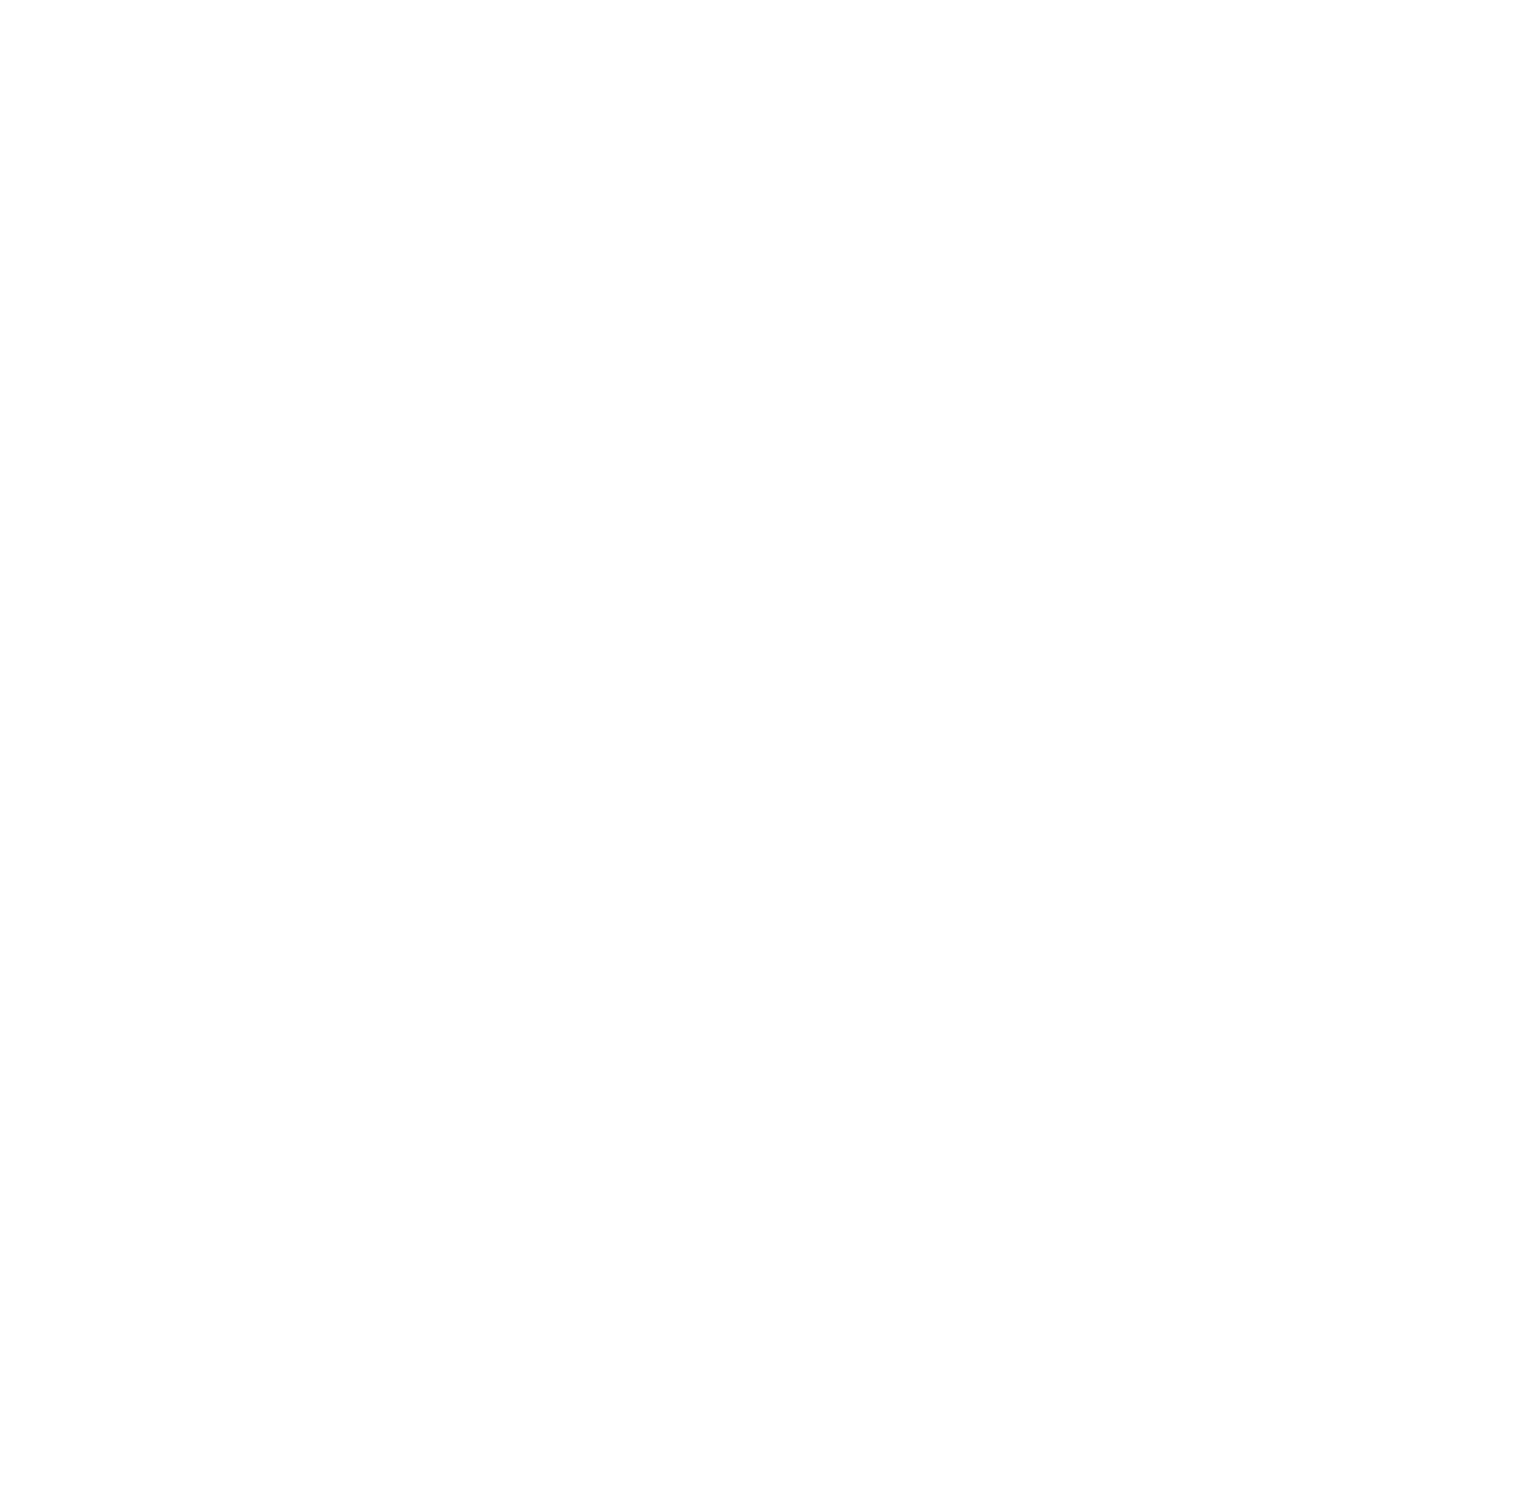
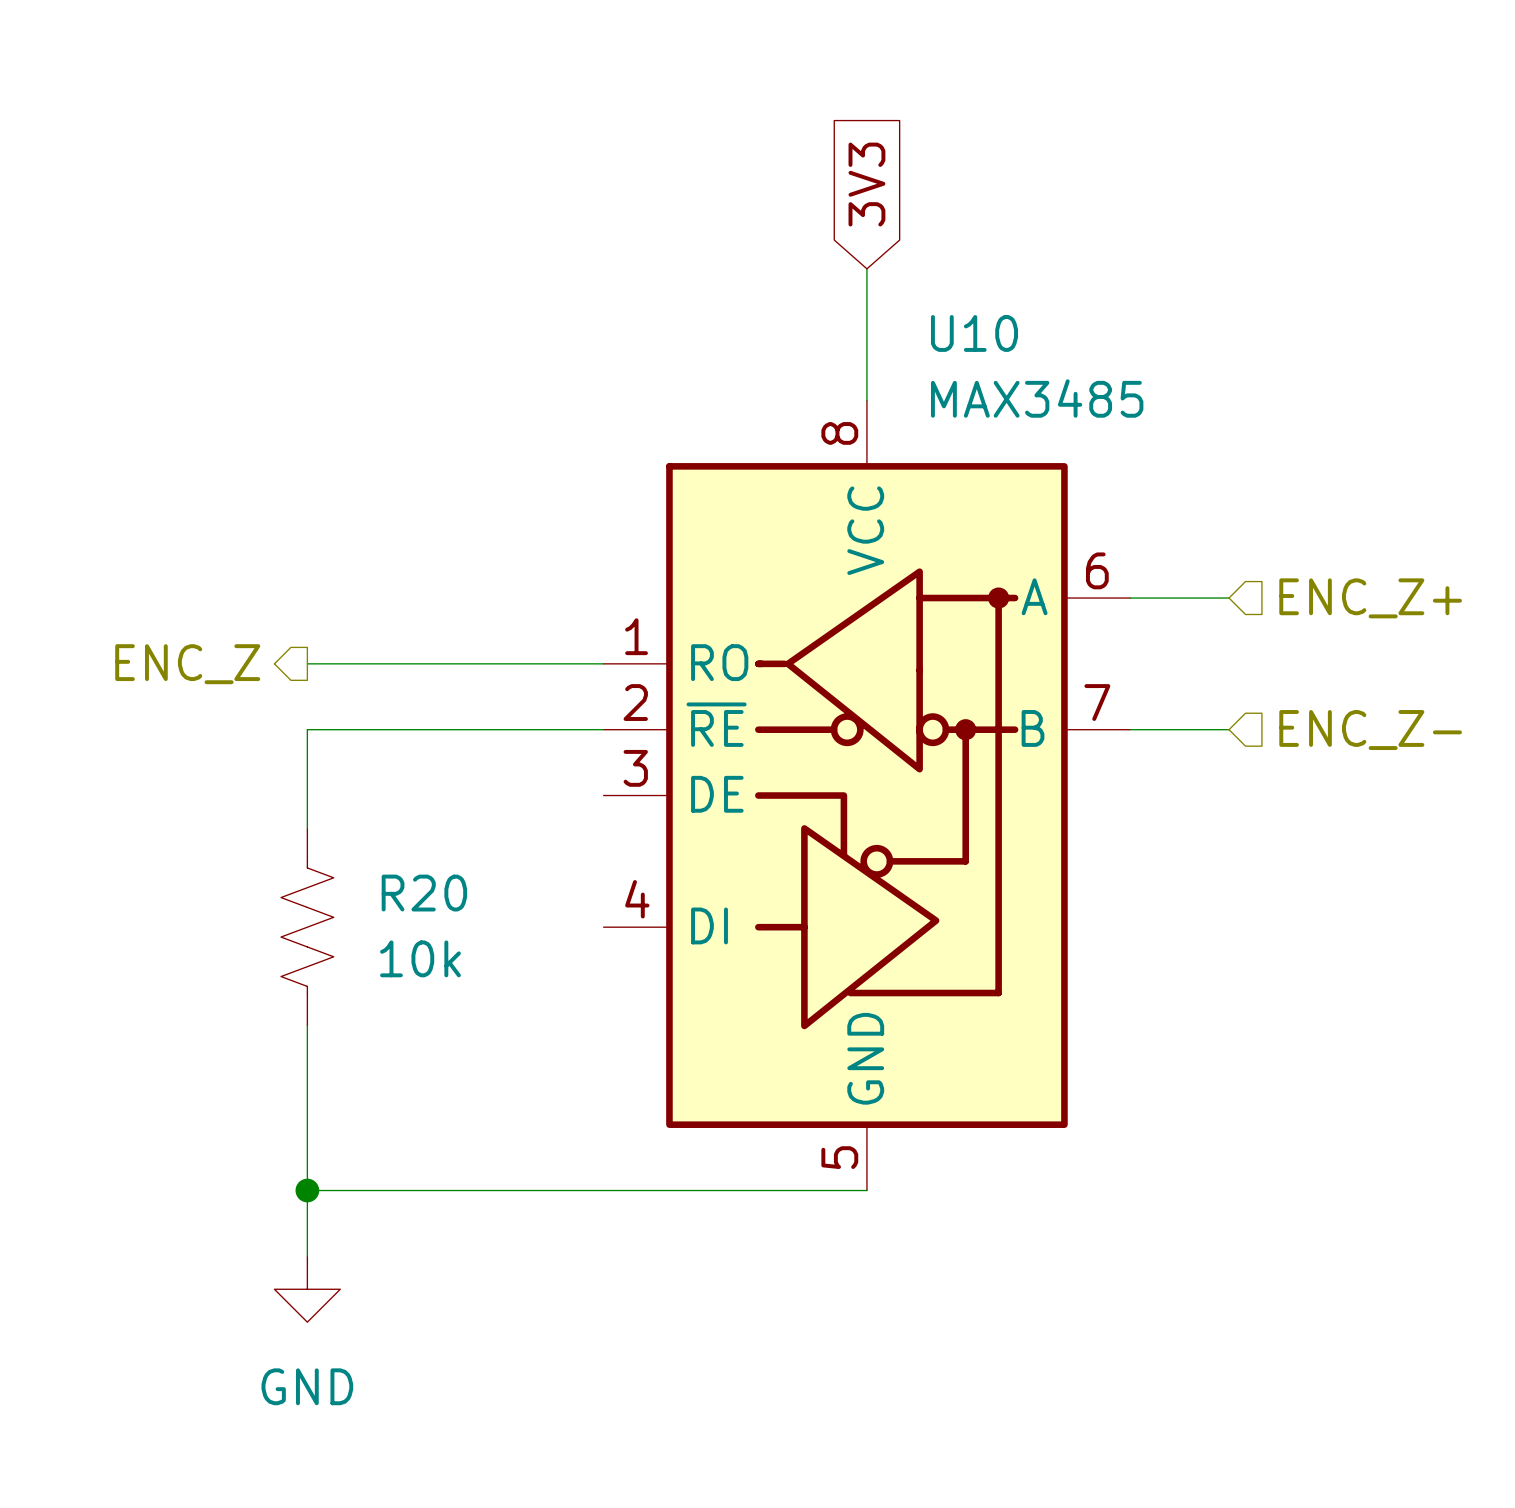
global label: none -> 3V3 (866, 184)
wire: none -> (866, 268) (866, 400)
wire: none -> (1130, 598) (1229, 598)
hierarchical label: none -> ENC_Z+ (1370, 598)
wire: none -> (307, 663) (603, 663)
hierarchical label: none -> ENC_Z (187, 664)
wire: none -> (603, 729) (307, 729) (307, 828)
wire: none -> (1130, 729) (1229, 729)
hierarchical label: none -> ENC_Z- (1370, 730)
U10: none -> MAX3485 (866, 795)
R20: none -> 10k (307, 927)
wire: none -> (307, 1025) (307, 1256)
wire: none -> (307, 1190) (866, 1190)
junction: none -> (307, 1190)
power symbol: none -> GND (307, 1289)

